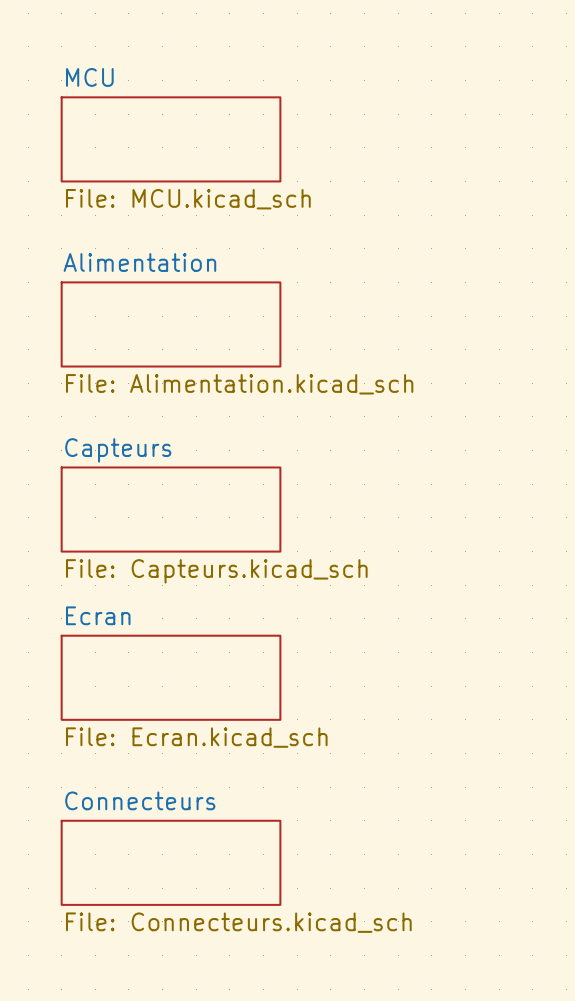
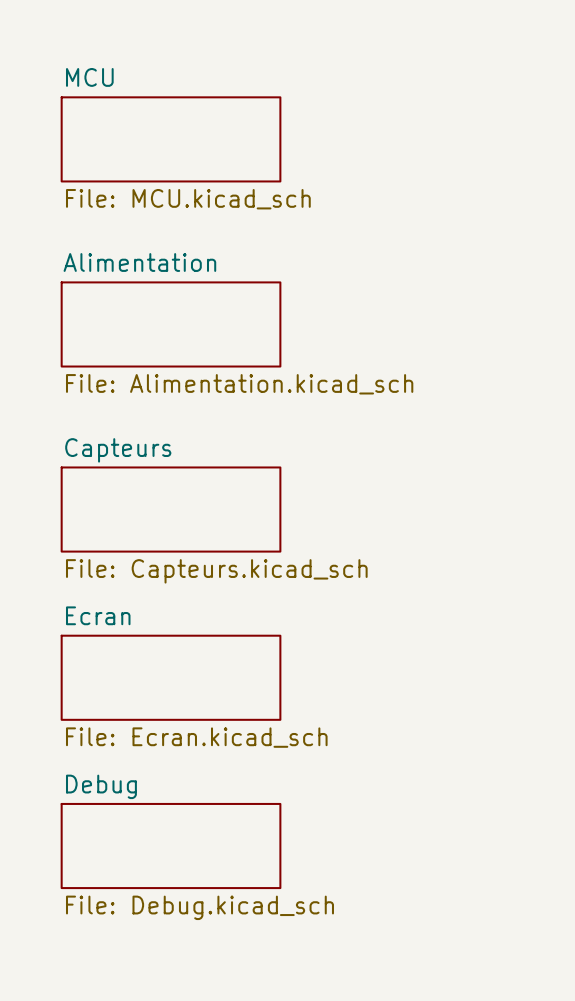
sheet Debug: none -> File: Debug.kicad_sch (171, 846)
sheet Connecteurs: File: Connecteurs.kicad_sch (171, 862) -> none

